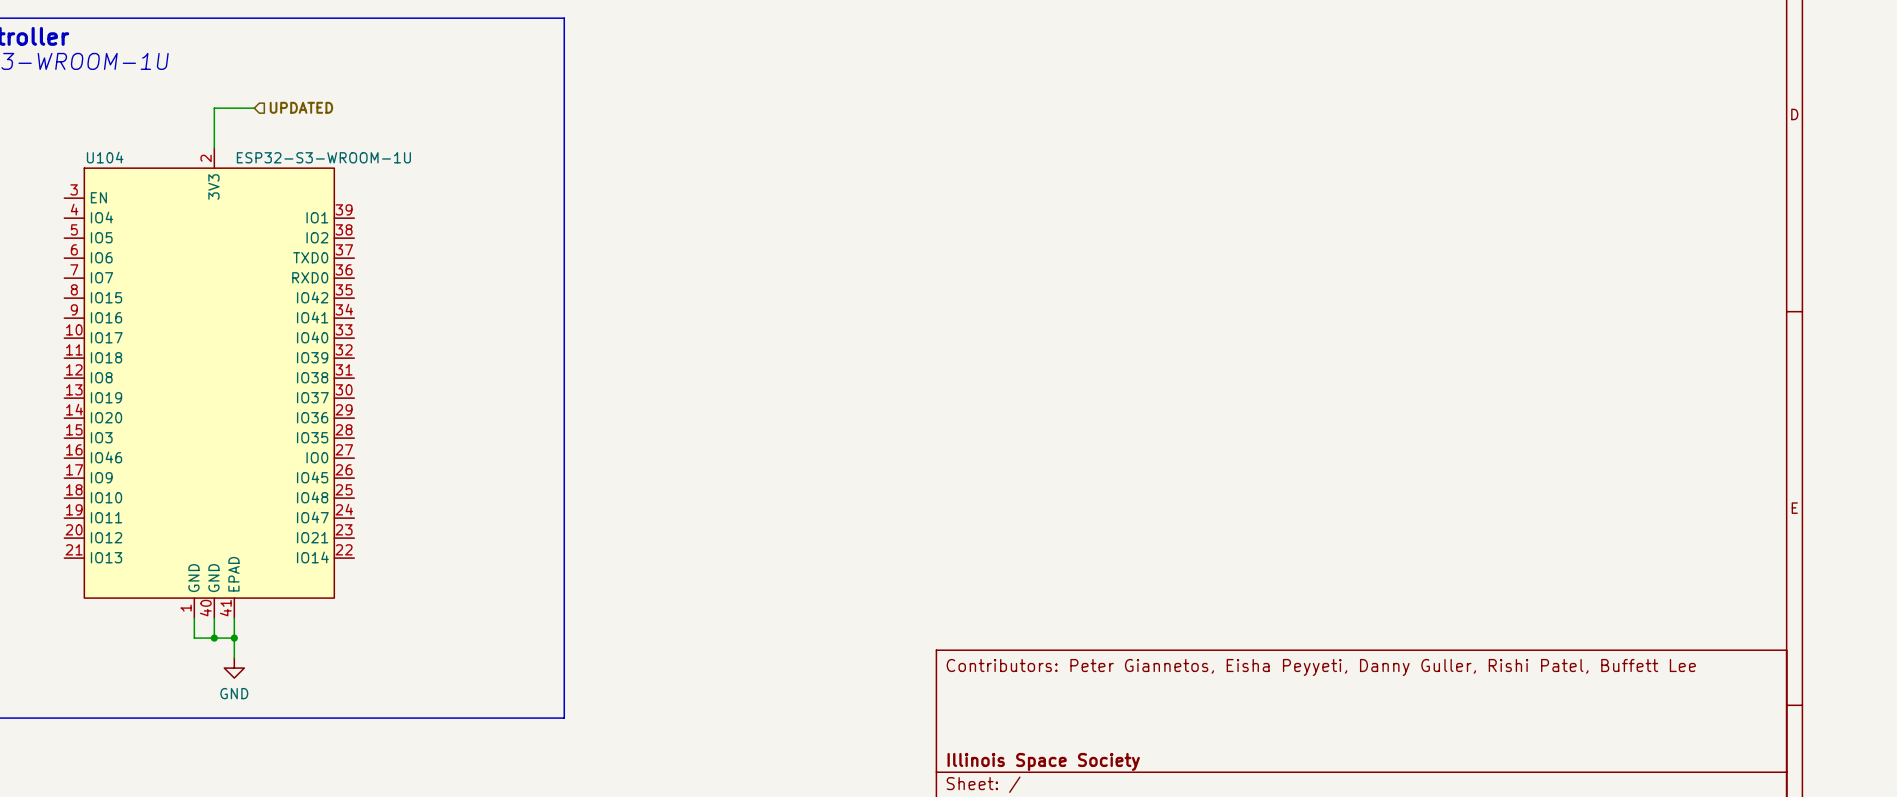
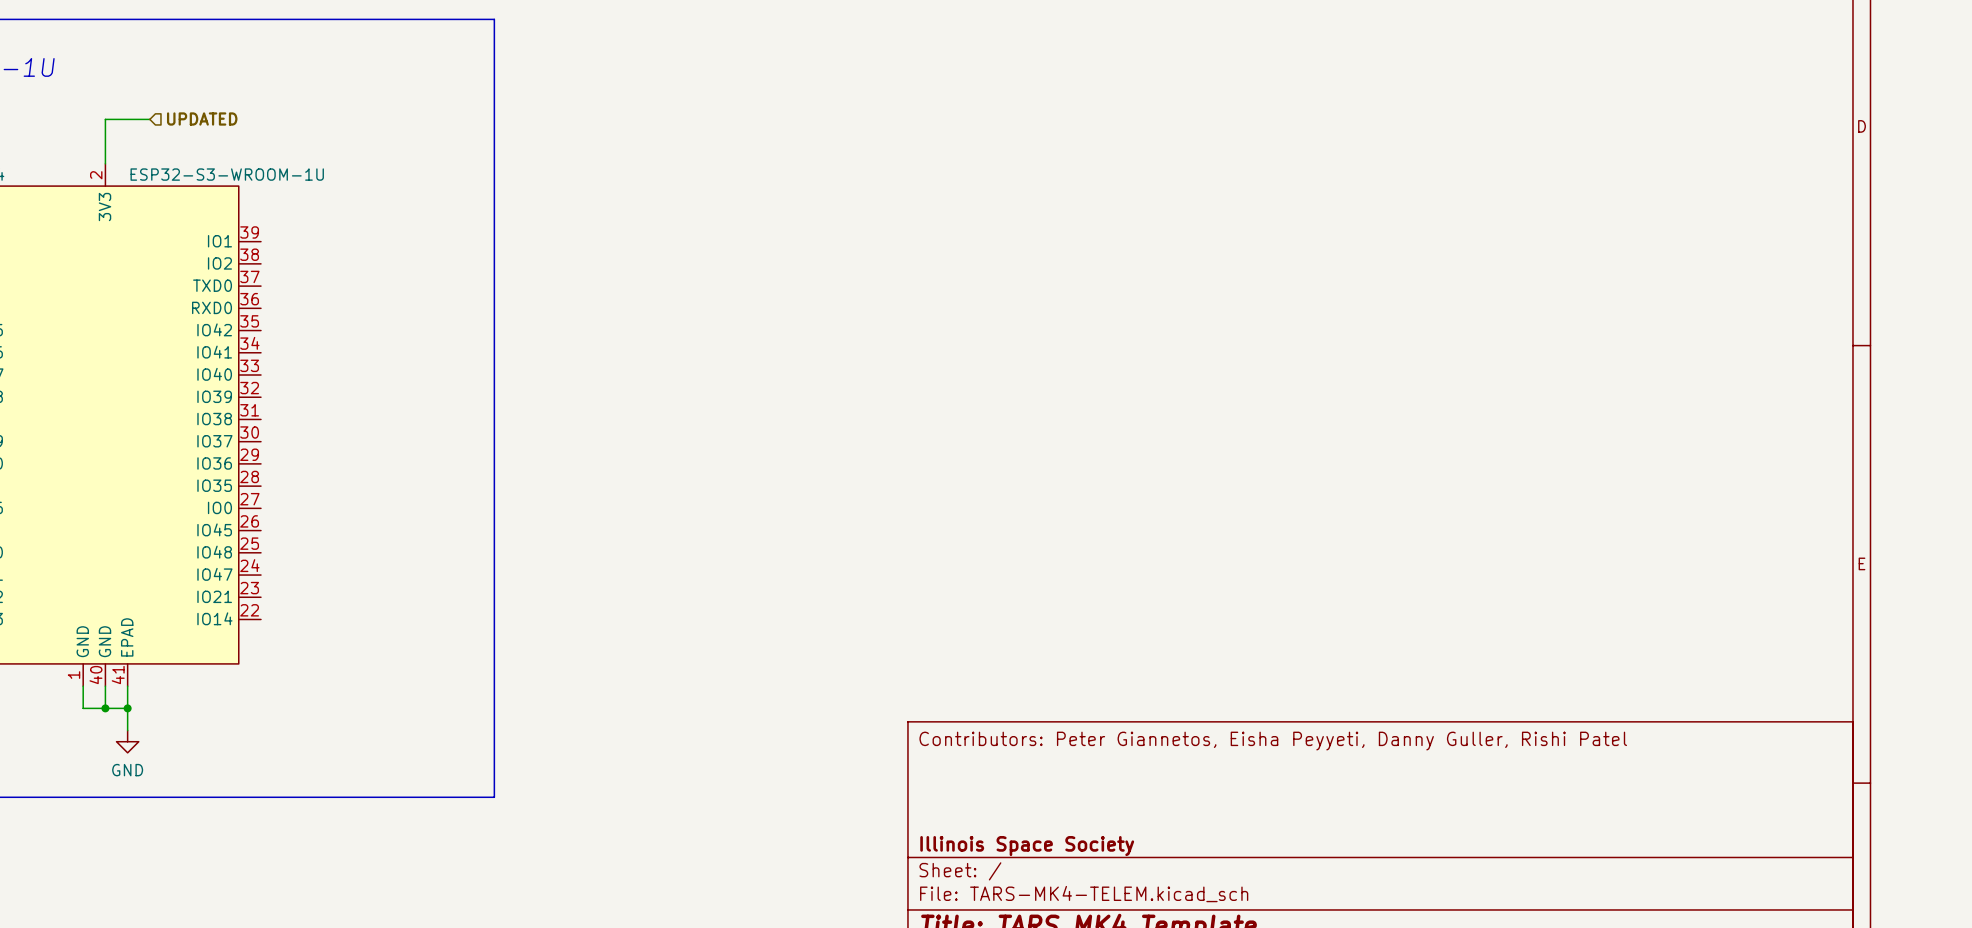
title block: Contributors: Peter Giannetos, Eisha Peyyeti, Danny Guller, Rishi Patel, Buffett Lee (1321, 667) -> Contributors: Peter Giannetos, Eisha Peyyeti, Danny Guller, Rishi Patel (1273, 741)

